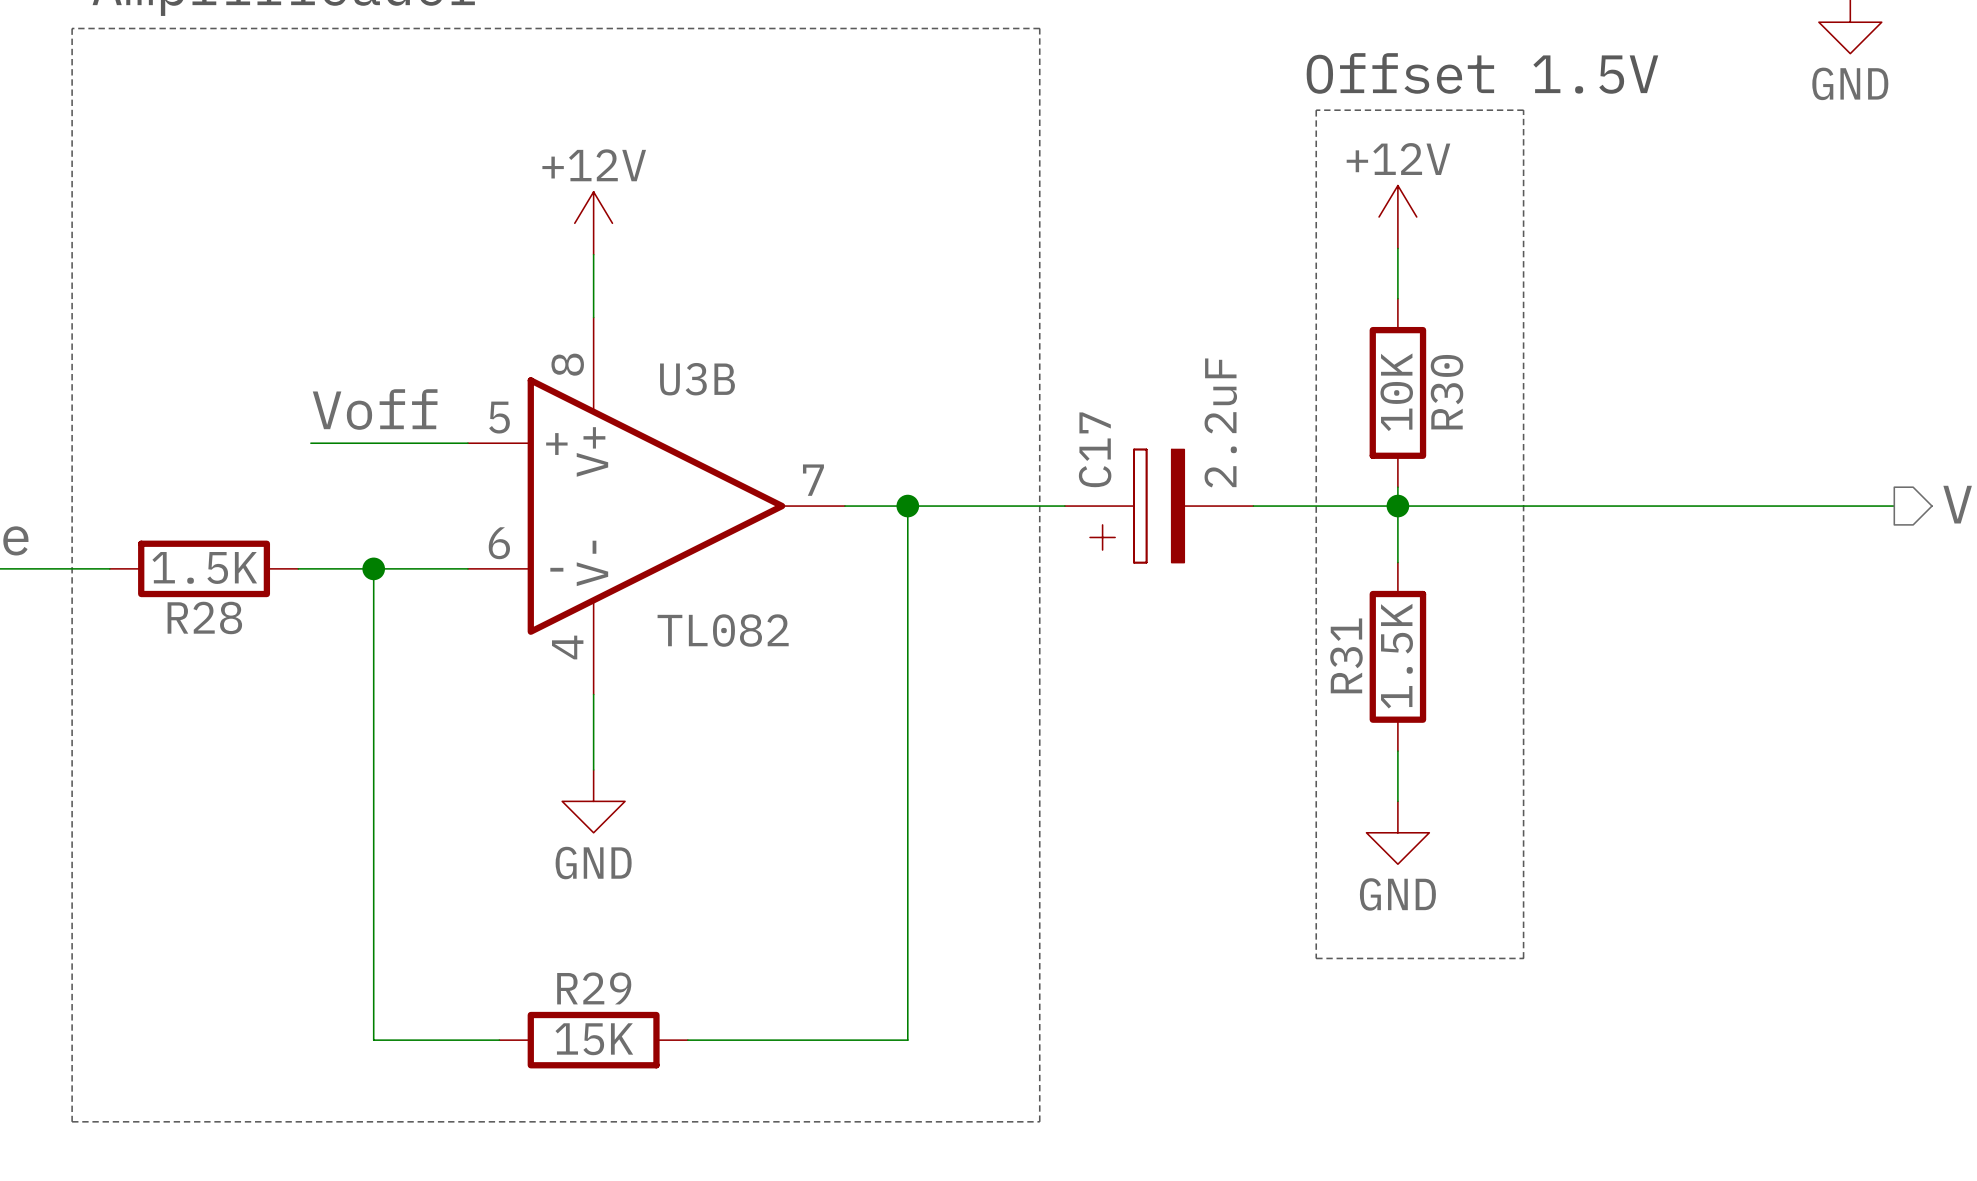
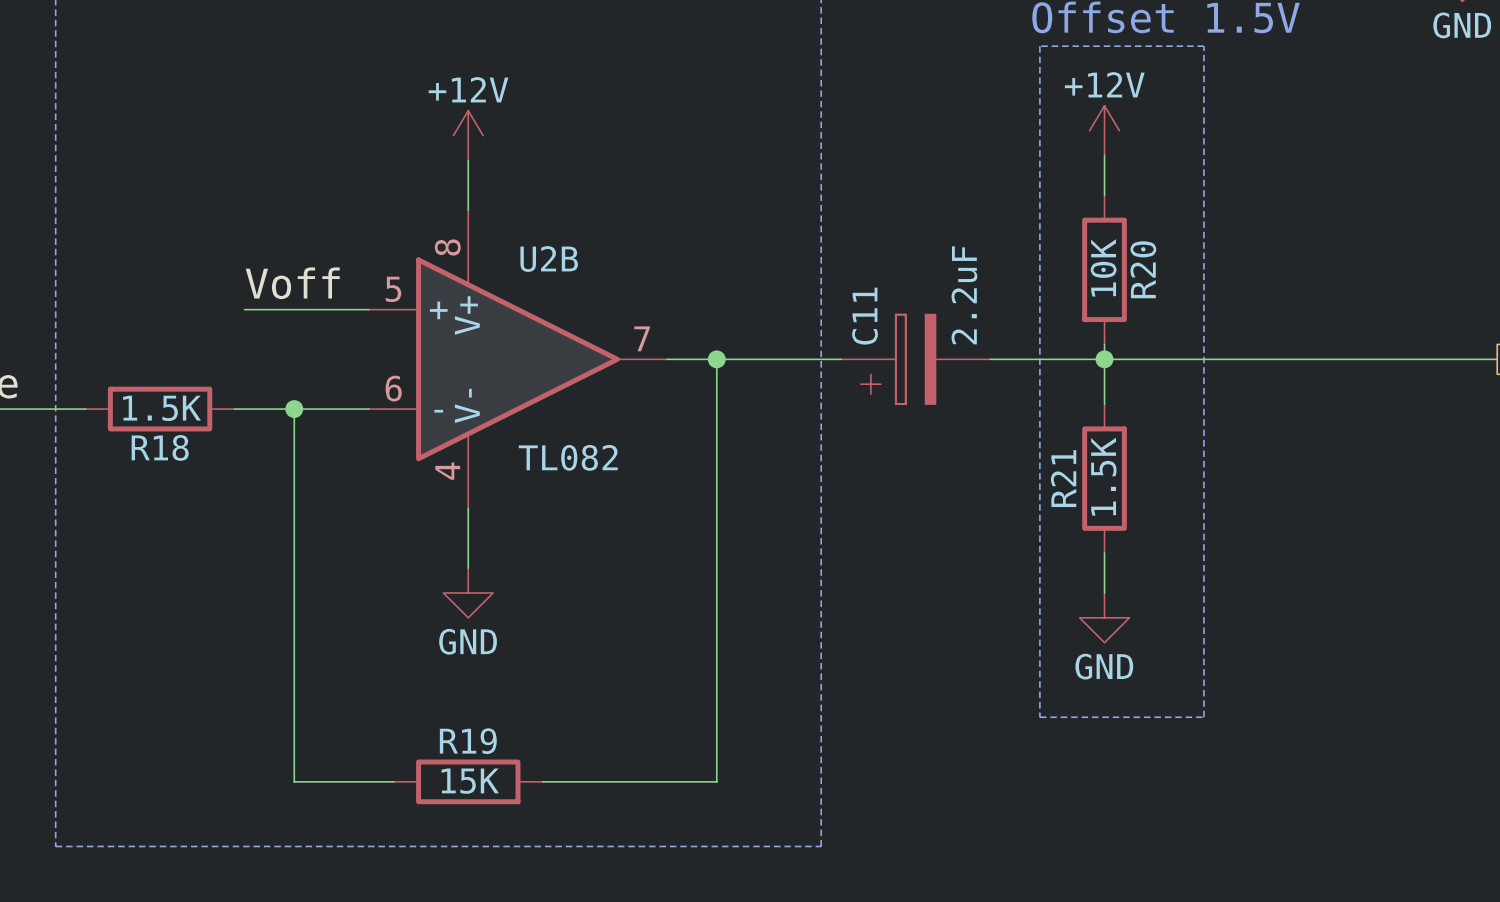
U3B name: U3B (697, 379) -> U2B (549, 259)
R30 name: R30 (1447, 392) -> R20 (1143, 269)
C17 name: C17 (1095, 449) -> C11 (865, 316)
R28 name: R28 (204, 617) -> R18 (160, 447)
R31 name: R31 (1346, 655) -> R21 (1063, 478)
R29 name: R29 (594, 988) -> R19 (468, 741)

